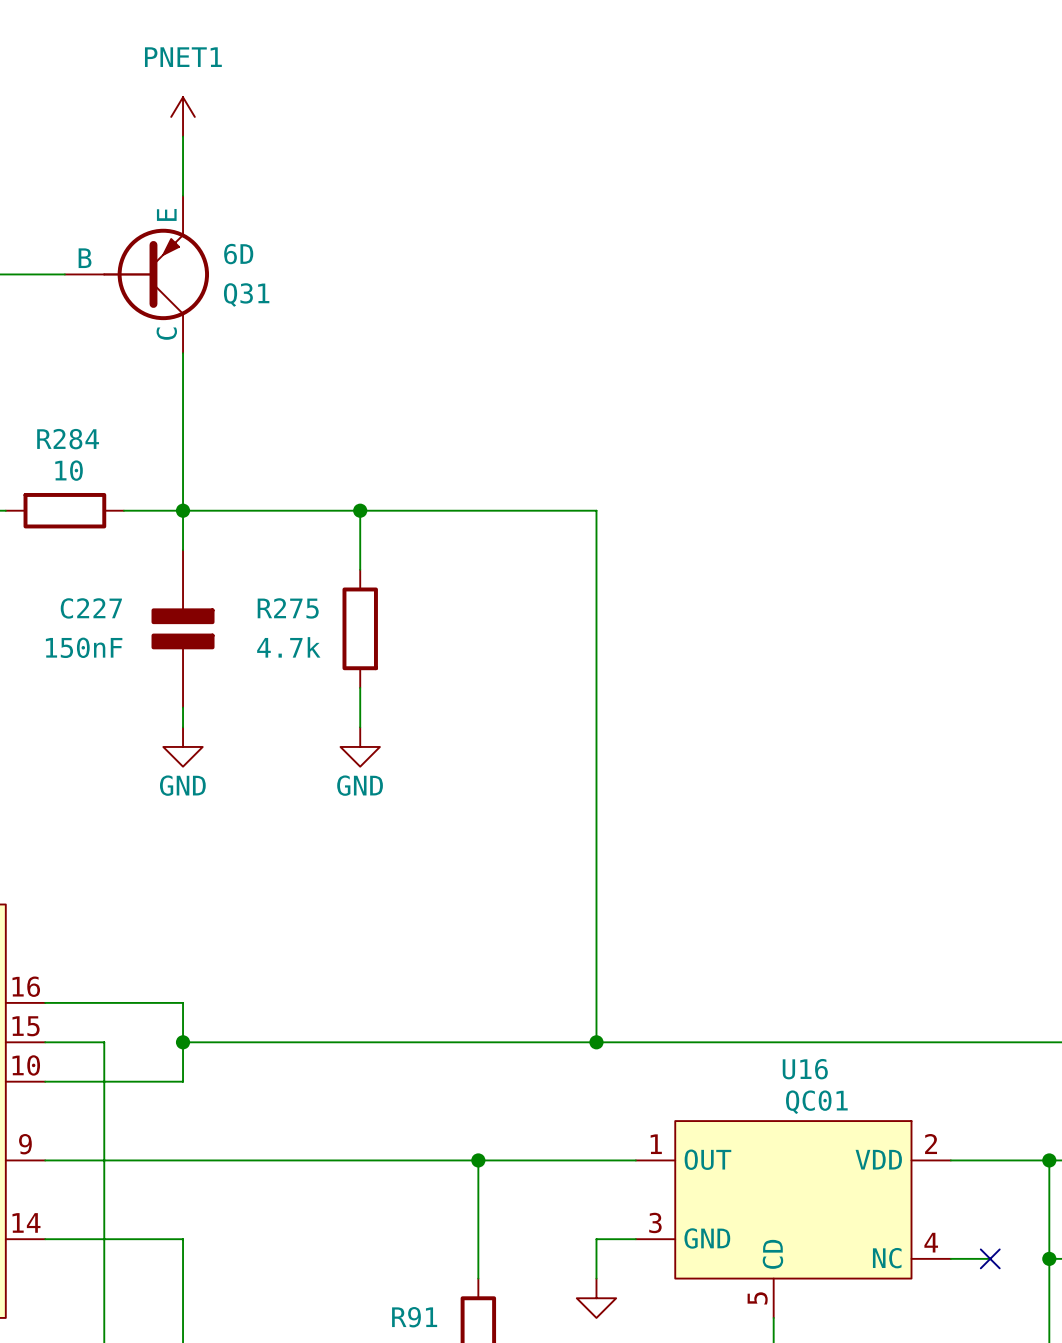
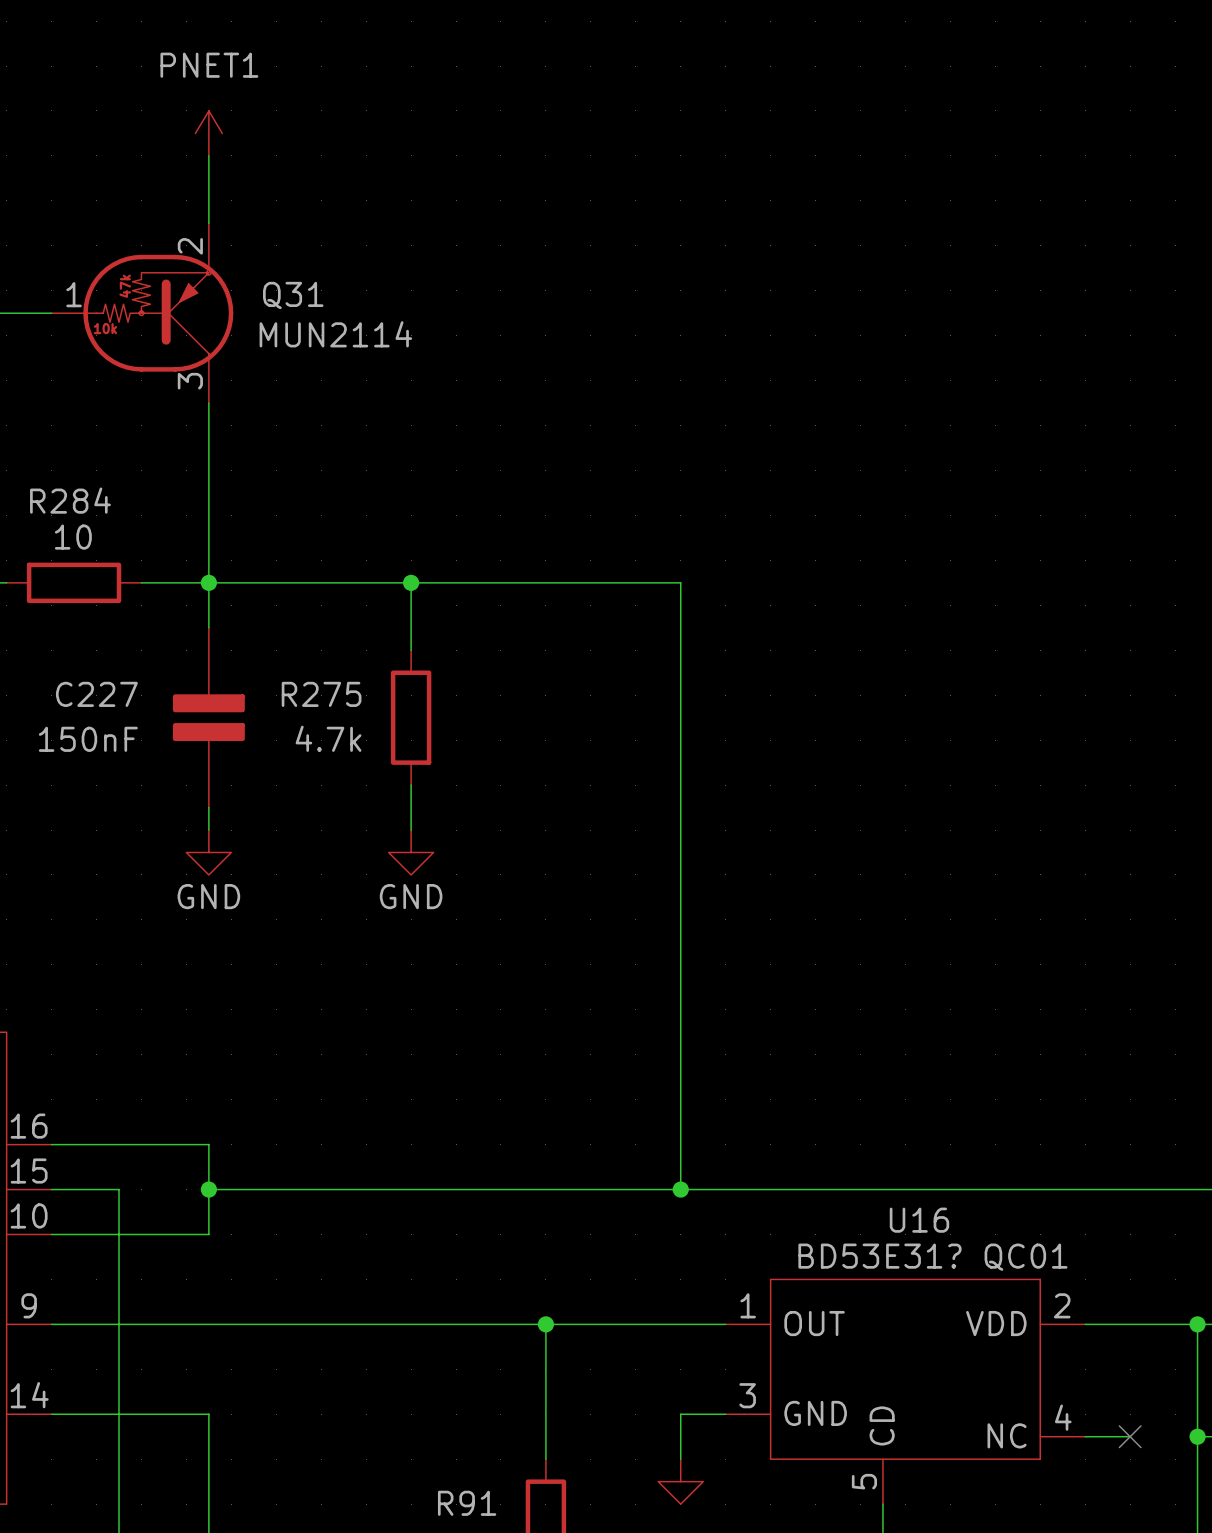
Q31 symbol: [64, 195, 210, 354] -> [51, 223, 234, 404]
Q31 value: 6D (238, 254) -> MUN2114 (335, 334)
Q31 name position: Q31 (246, 295) -> Q31 (293, 295)
U16 value: QC01 (816, 1102) -> BD53E31? QC01 (932, 1257)

